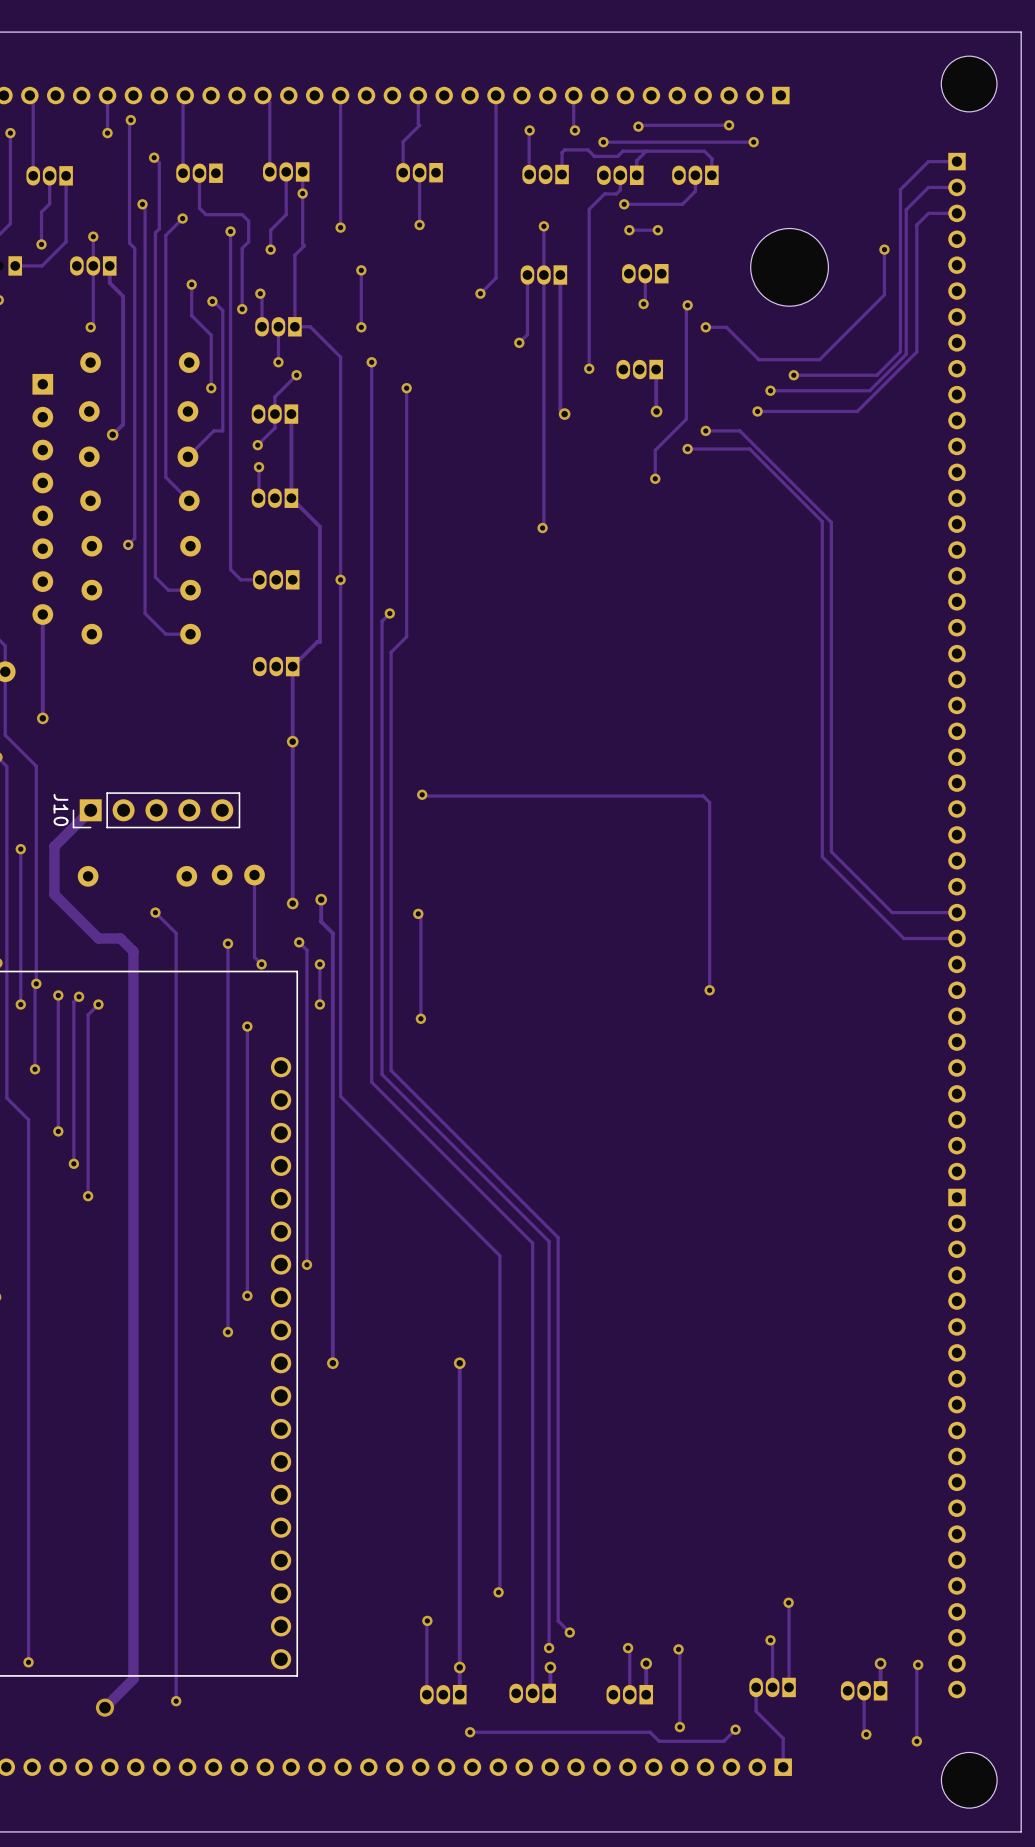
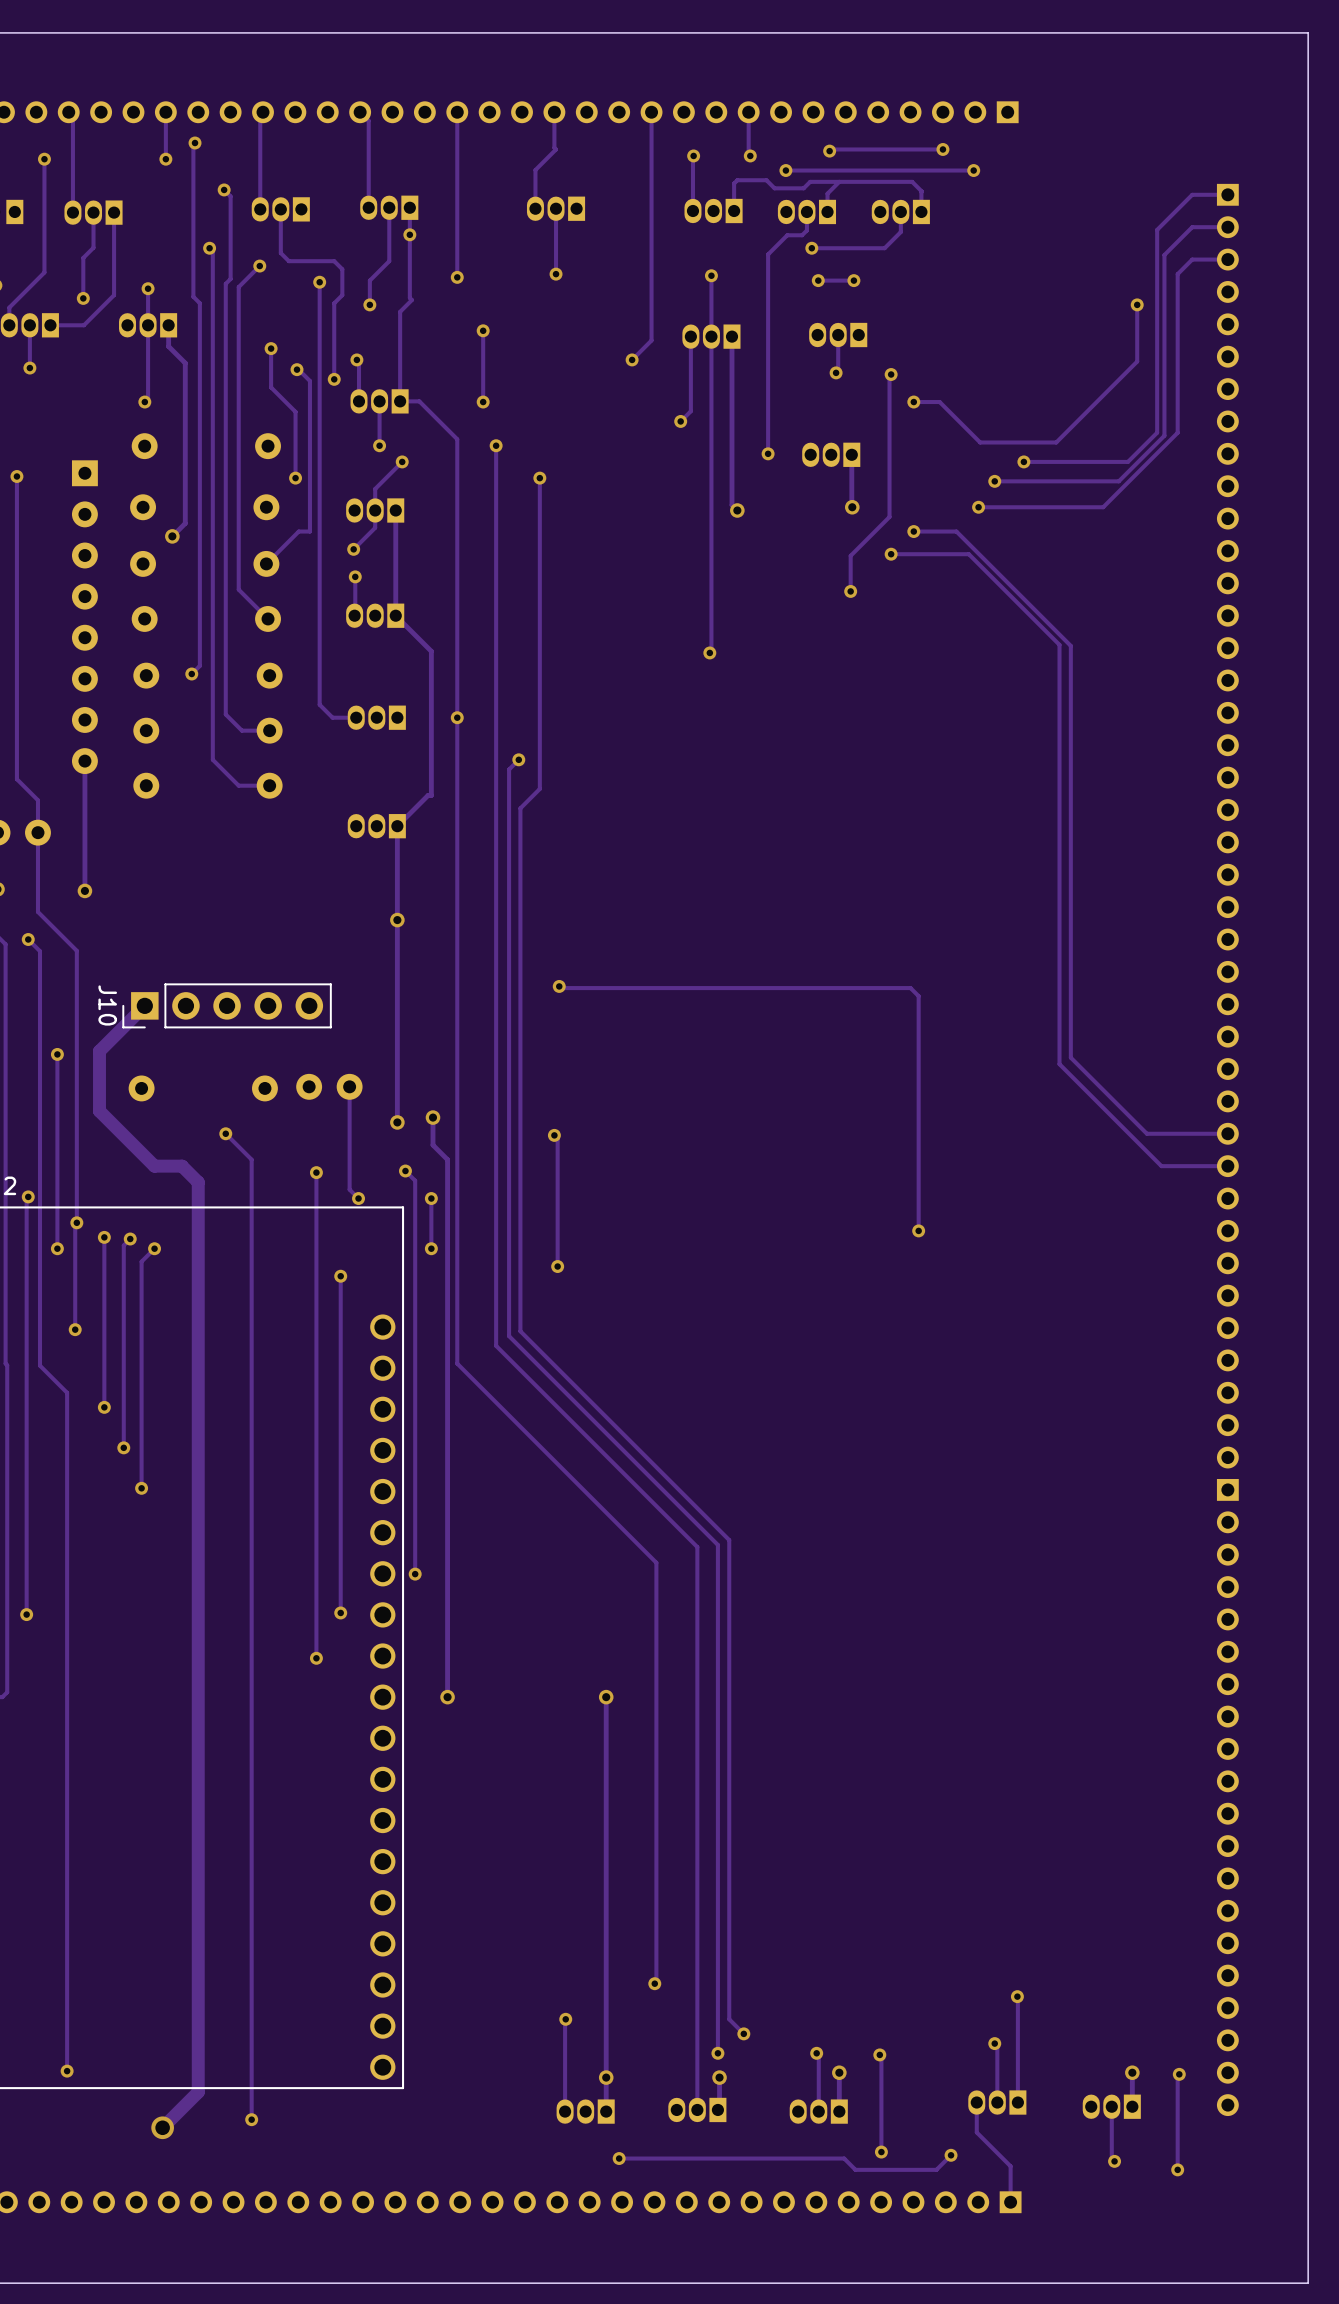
part: (969, 84) -> none
part: (789, 267) -> none
part: (969, 1780) -> none

